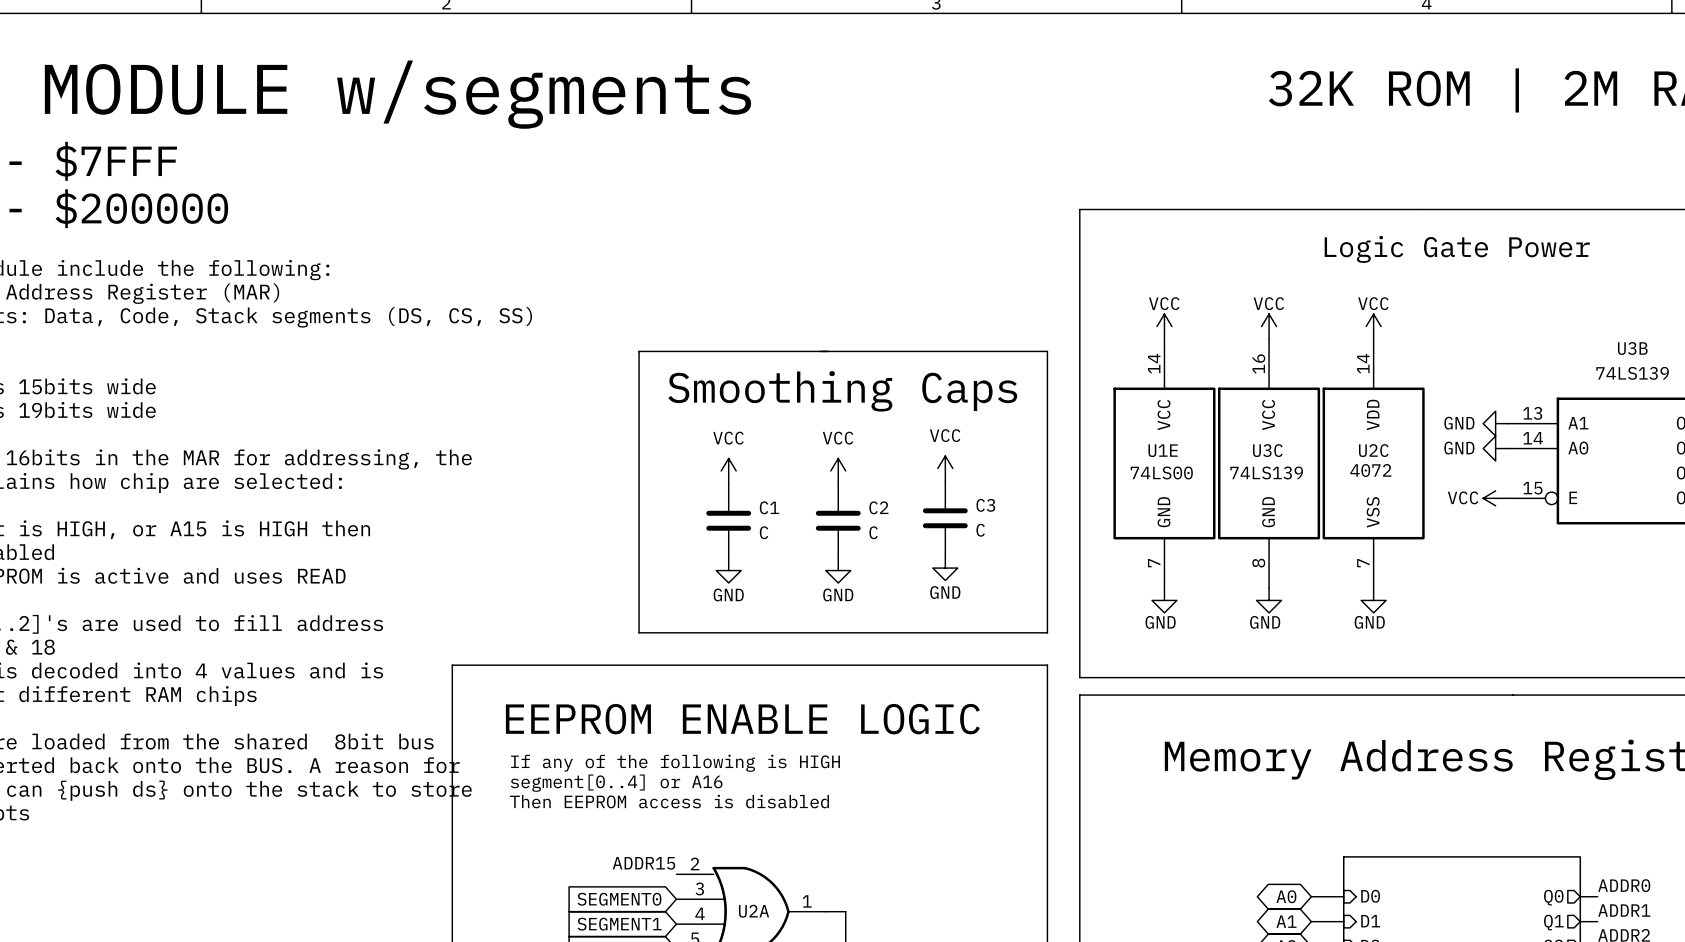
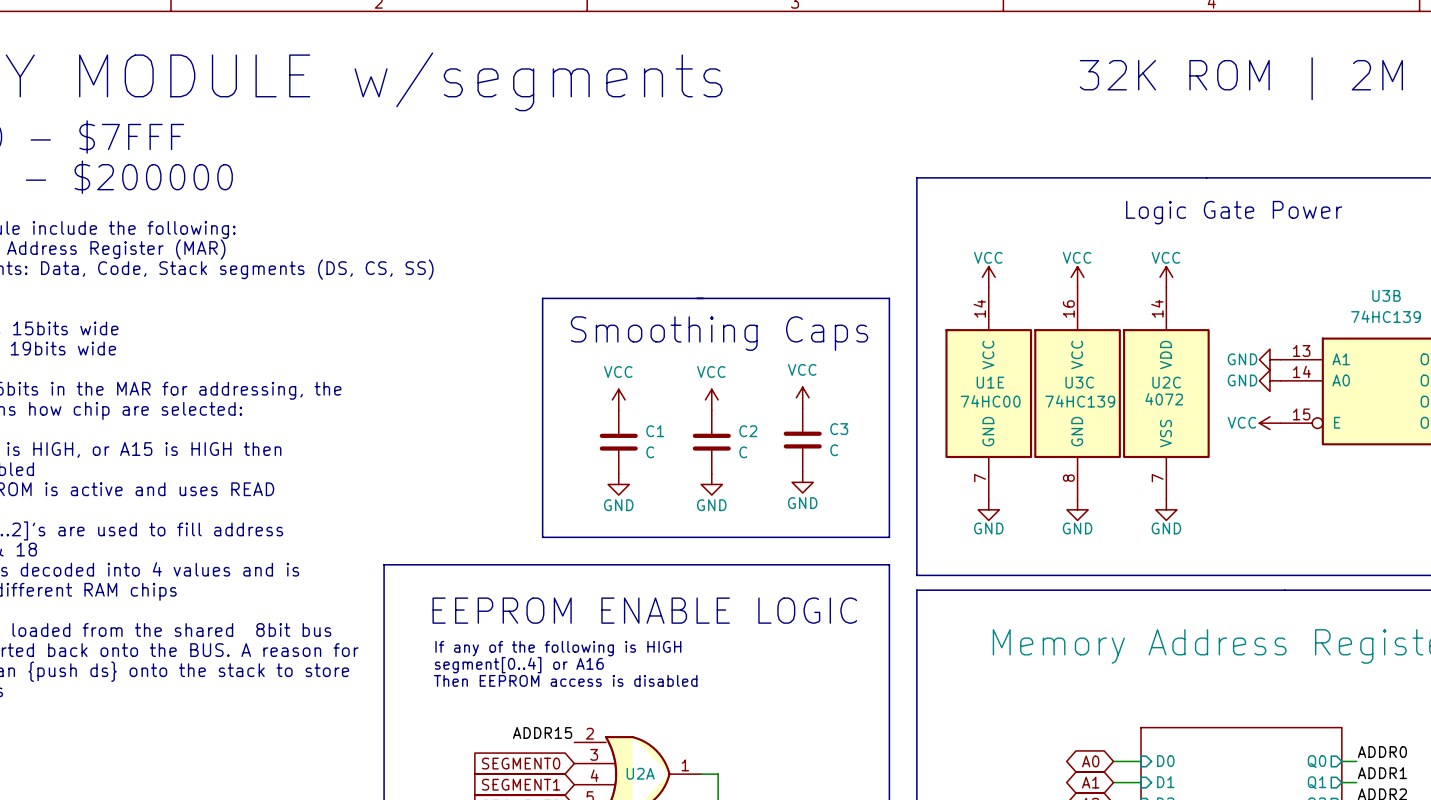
U3B value: 74LS139 (1632, 373) -> 74HC139 (1386, 316)
U1E value: 74LS00 (1161, 472) -> 74HC00 (990, 401)
U3C value: 74LS139 (1266, 472) -> 74HC139 (1080, 401)

